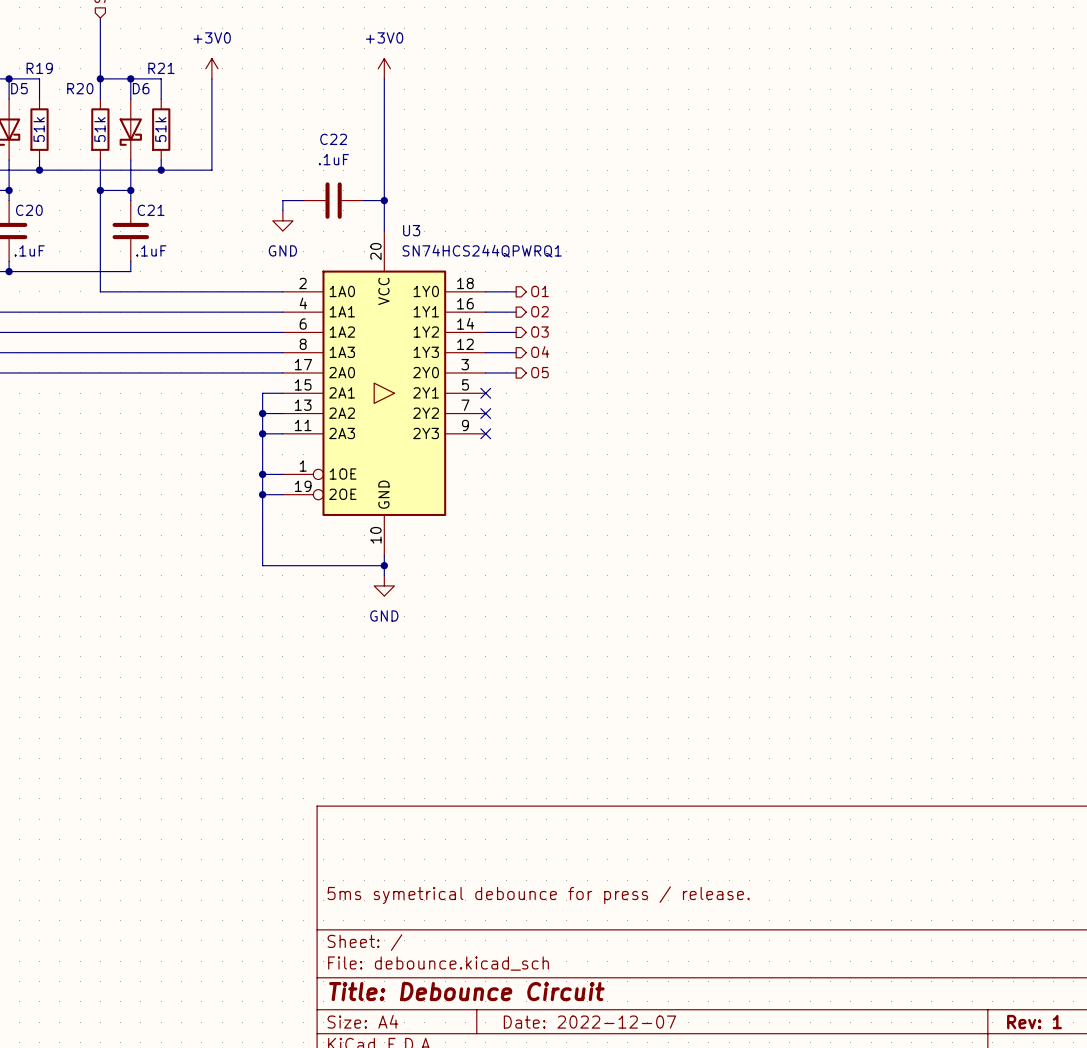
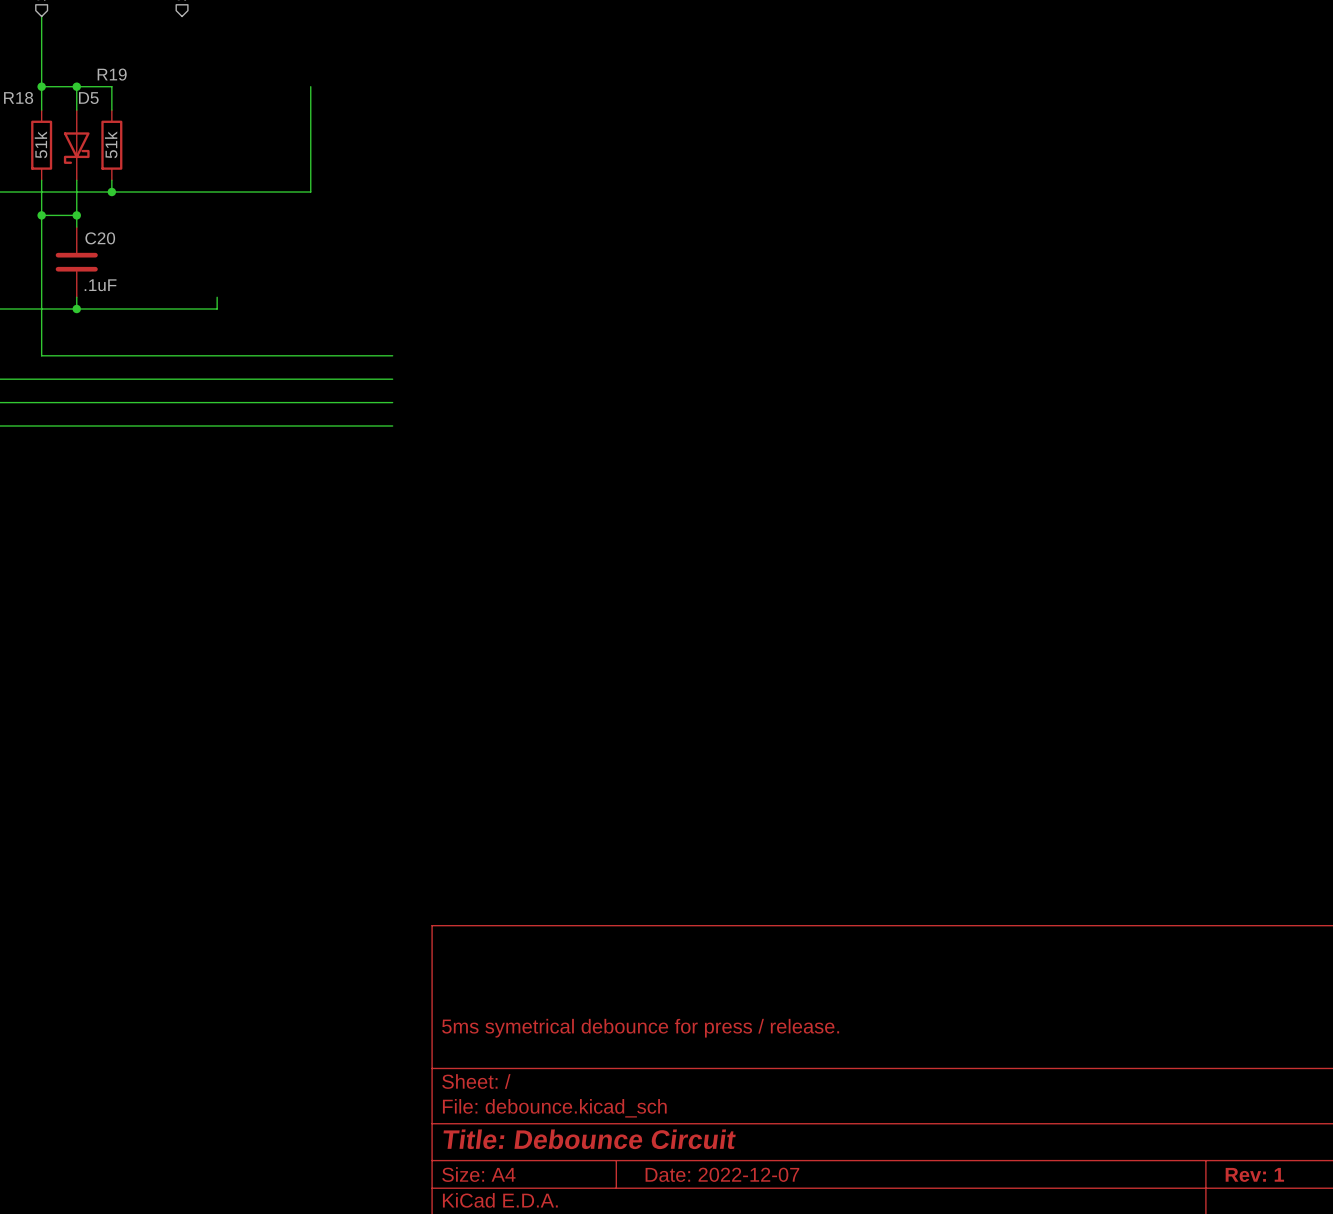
wire: (100, 18) (100, 99) -> none
power symbol: +3V0 (211, 68) -> none
power symbol: +3V0 (384, 68) -> none
wire: (100, 78) (161, 78) (161, 99) -> none
junction: (100, 78) -> none
wire: (130, 78) (130, 99) -> none
junction: (130, 78) -> none
wire: (384, 78) (384, 231) -> none
R20: 51k (100, 129) -> none
D6: (130, 129) -> none
R21: 51k (161, 129) -> none
wire: (100, 160) (100, 291) (282, 291) -> none
wire: (130, 160) (130, 200) -> none
wire: (161, 160) (161, 170) -> none
junction: (161, 170) -> none
wire: (100, 190) (130, 190) -> none
junction: (100, 190) -> none
junction: (130, 190) -> none
wire: (303, 200) (282, 200) (282, 210) -> none
C22: .1uF (333, 200) -> none
wire: (364, 200) (384, 200) -> none
junction: (384, 200) -> none
power symbol: GND (282, 220) -> none
C21: .1uF (130, 231) -> none
wire: (485, 291) (516, 291) -> none
hierarchical label: O1 (539, 291) -> none
hierarchical label: O2 (539, 311) -> none
wire: (485, 312) (516, 312) -> none
wire: (485, 332) (516, 332) -> none
hierarchical label: O3 (539, 332) -> none
wire: (485, 352) (516, 352) -> none
hierarchical label: O4 (540, 352) -> none
wire: (485, 372) (516, 372) -> none
hierarchical label: O5 (539, 372) -> none
wire: (282, 393) (262, 393) (262, 565) (384, 565) -> none
U3: SN74HCS244QPWRQ1 (384, 393) -> none
no-connect mark: (485, 393) -> none
wire: (262, 413) (282, 413) -> none
junction: (262, 413) -> none
no-connect mark: (485, 413) -> none
wire: (262, 433) (282, 433) -> none
junction: (262, 433) -> none
no-connect mark: (485, 433) -> none
wire: (262, 474) (282, 474) -> none
junction: (262, 474) -> none
wire: (262, 494) (282, 494) -> none
junction: (262, 494) -> none
wire: (384, 555) (384, 575) -> none
junction: (384, 565) -> none
power symbol: GND (384, 585) -> none

